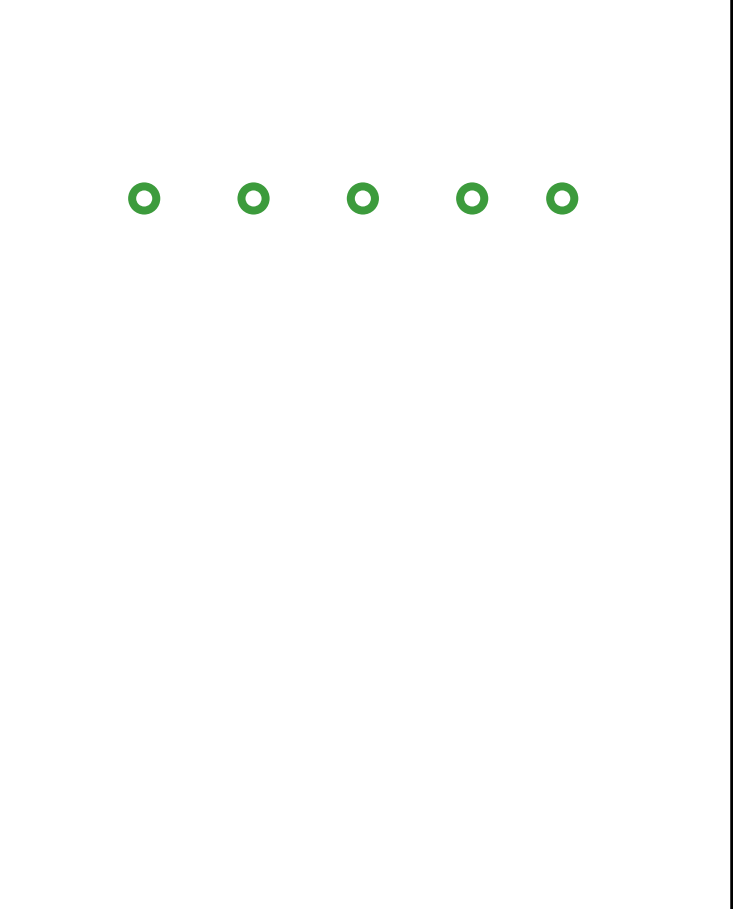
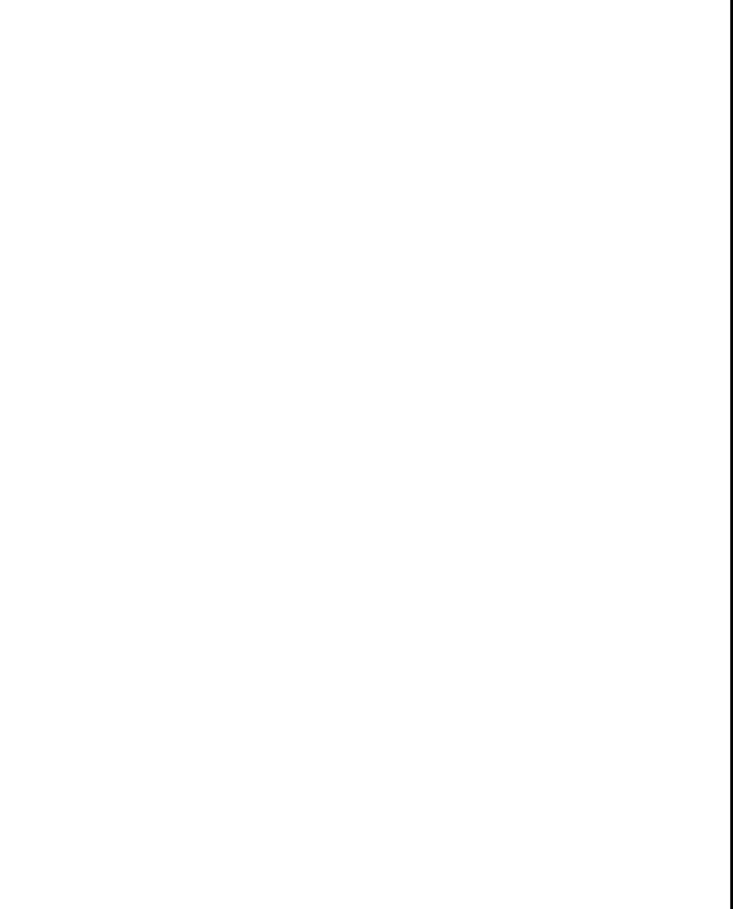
part: (144, 198) -> none
part: (253, 198) -> none
part: (362, 198) -> none
part: (472, 198) -> none
part: (562, 198) -> none

